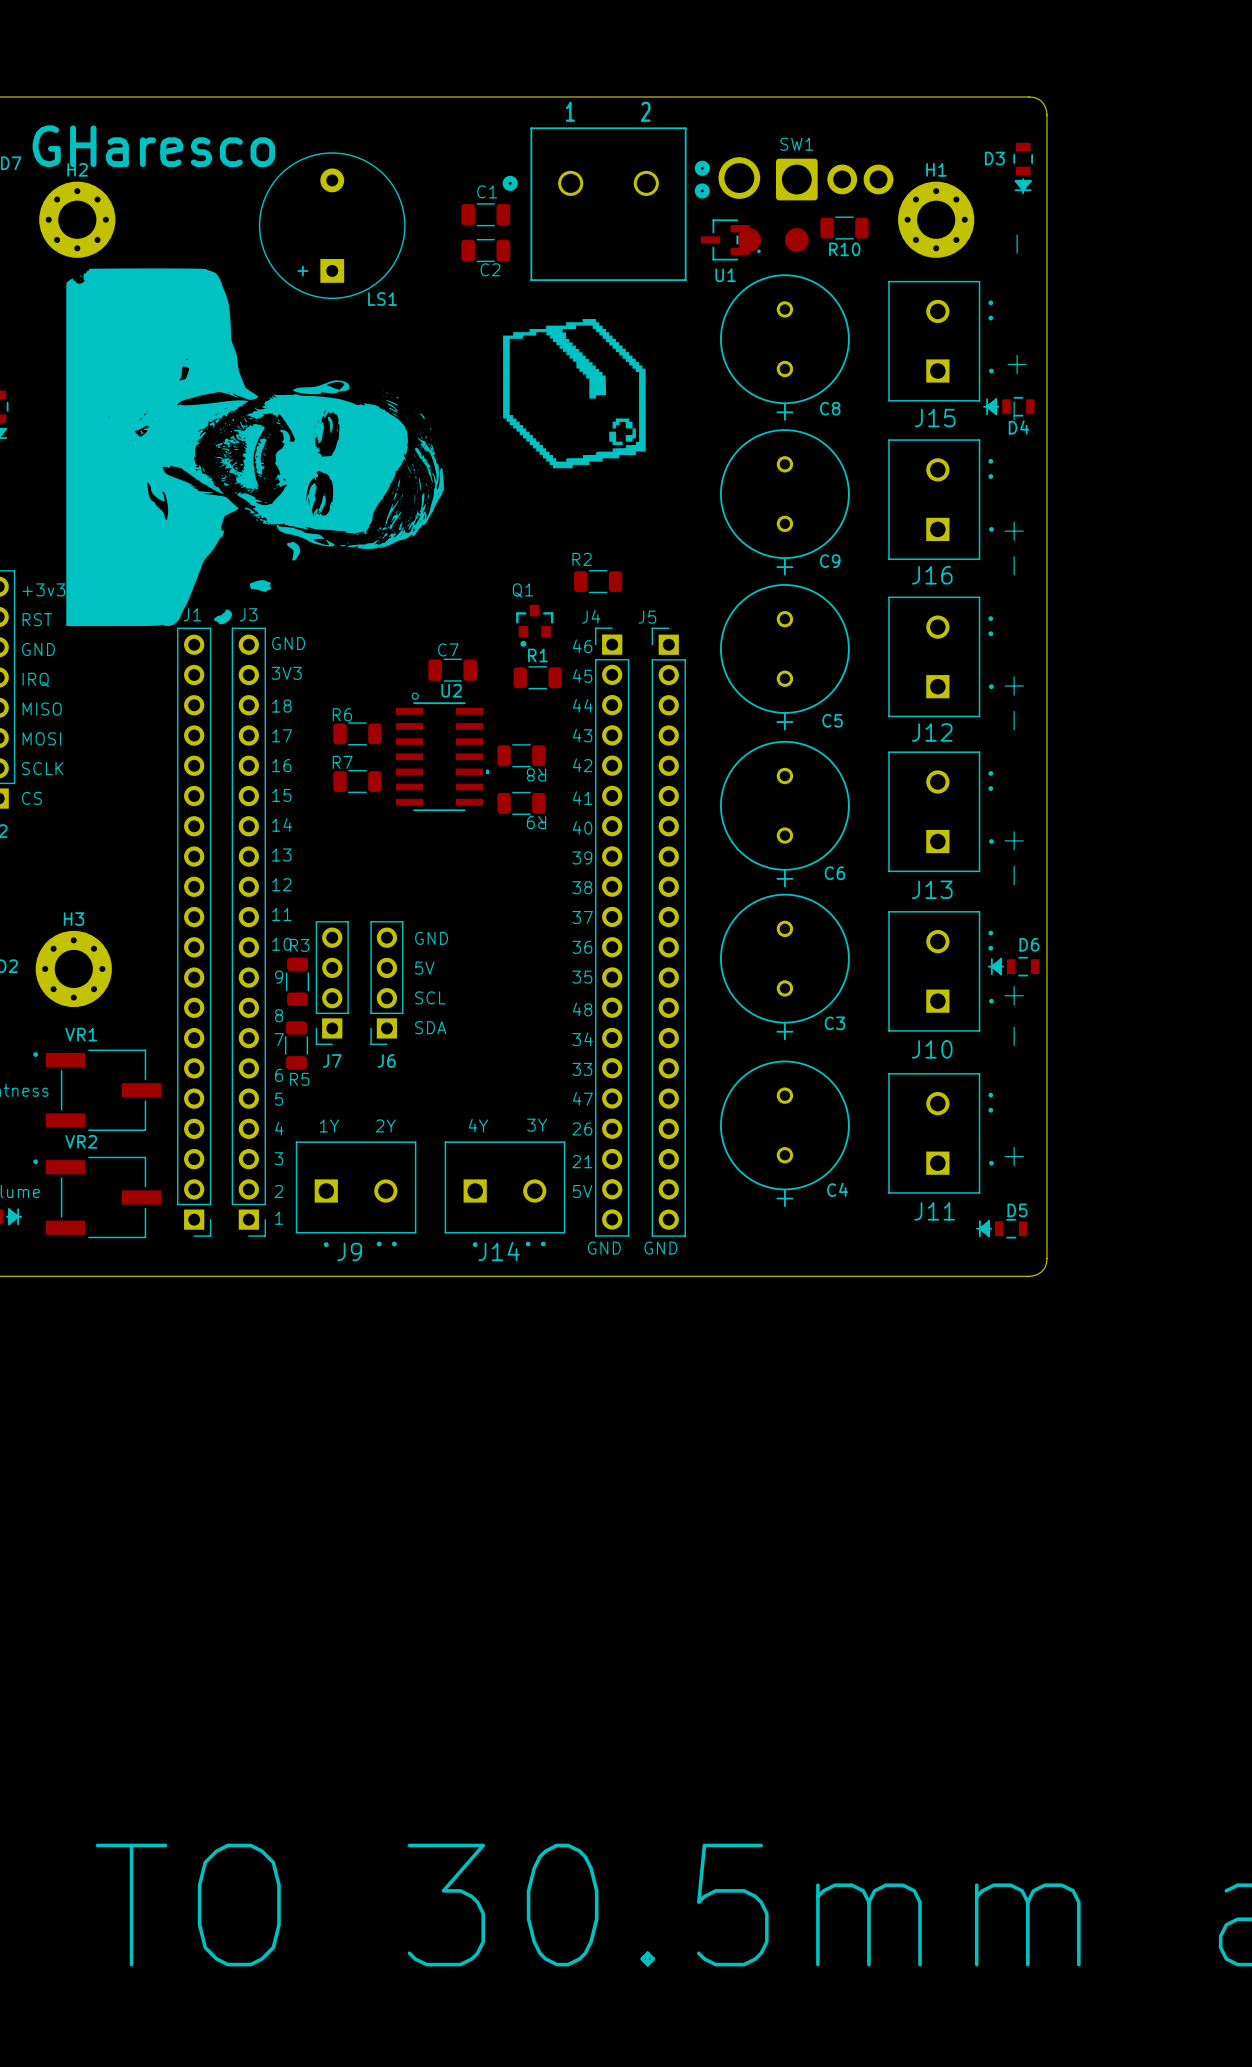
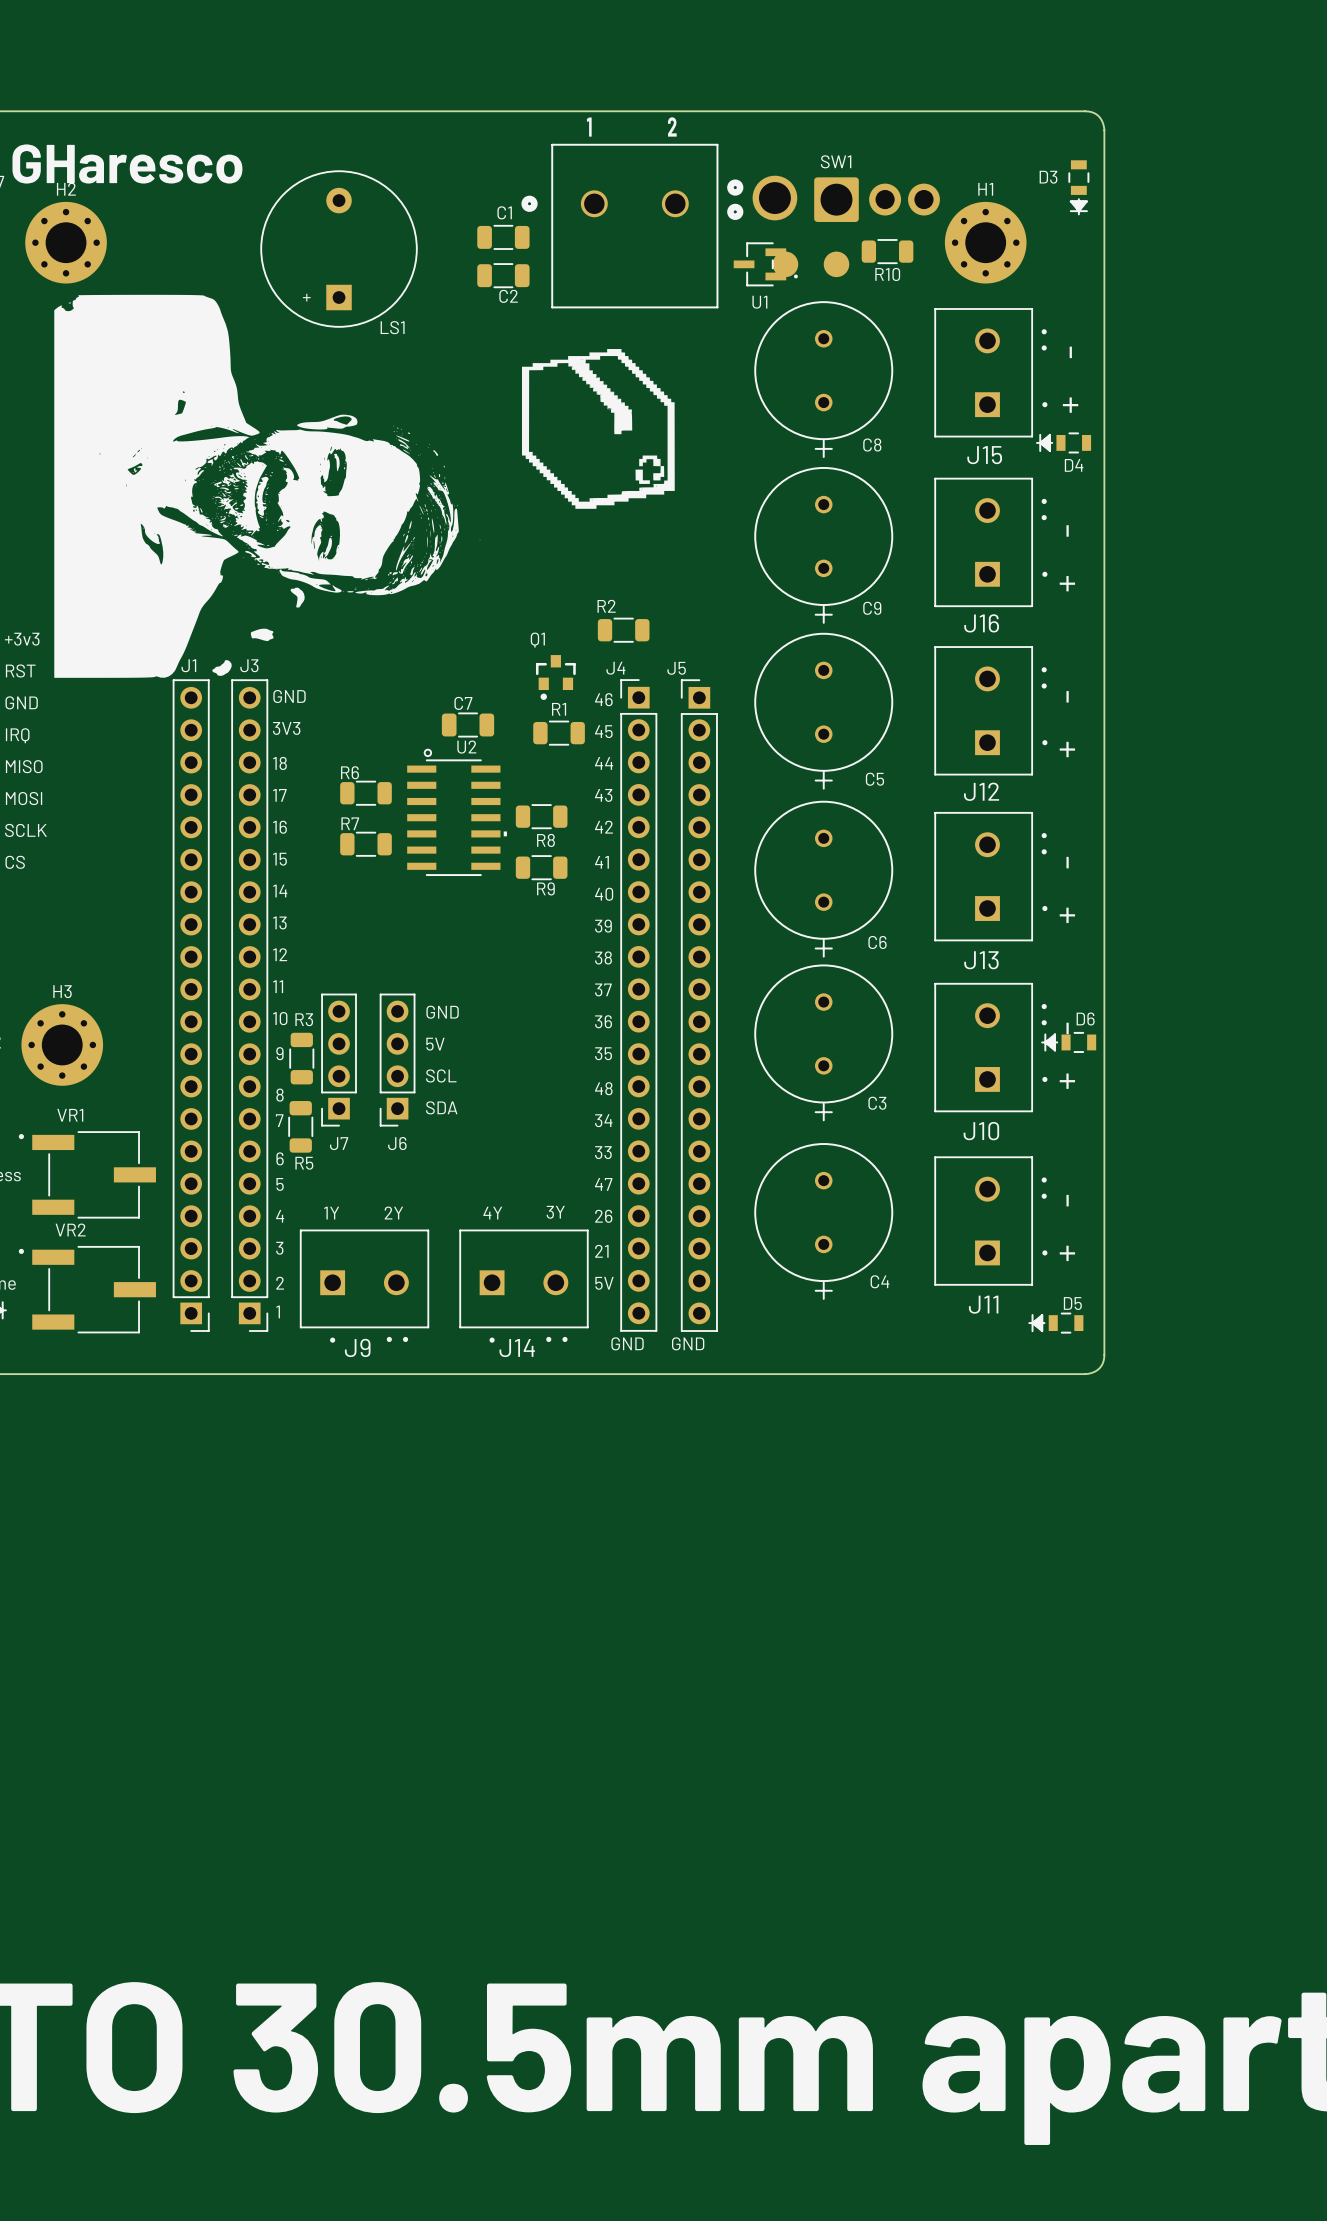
R8 name rotation: 0° (536, 774) -> 180° (545, 840)
R9 name rotation: 0° (536, 822) -> 180° (545, 888)

